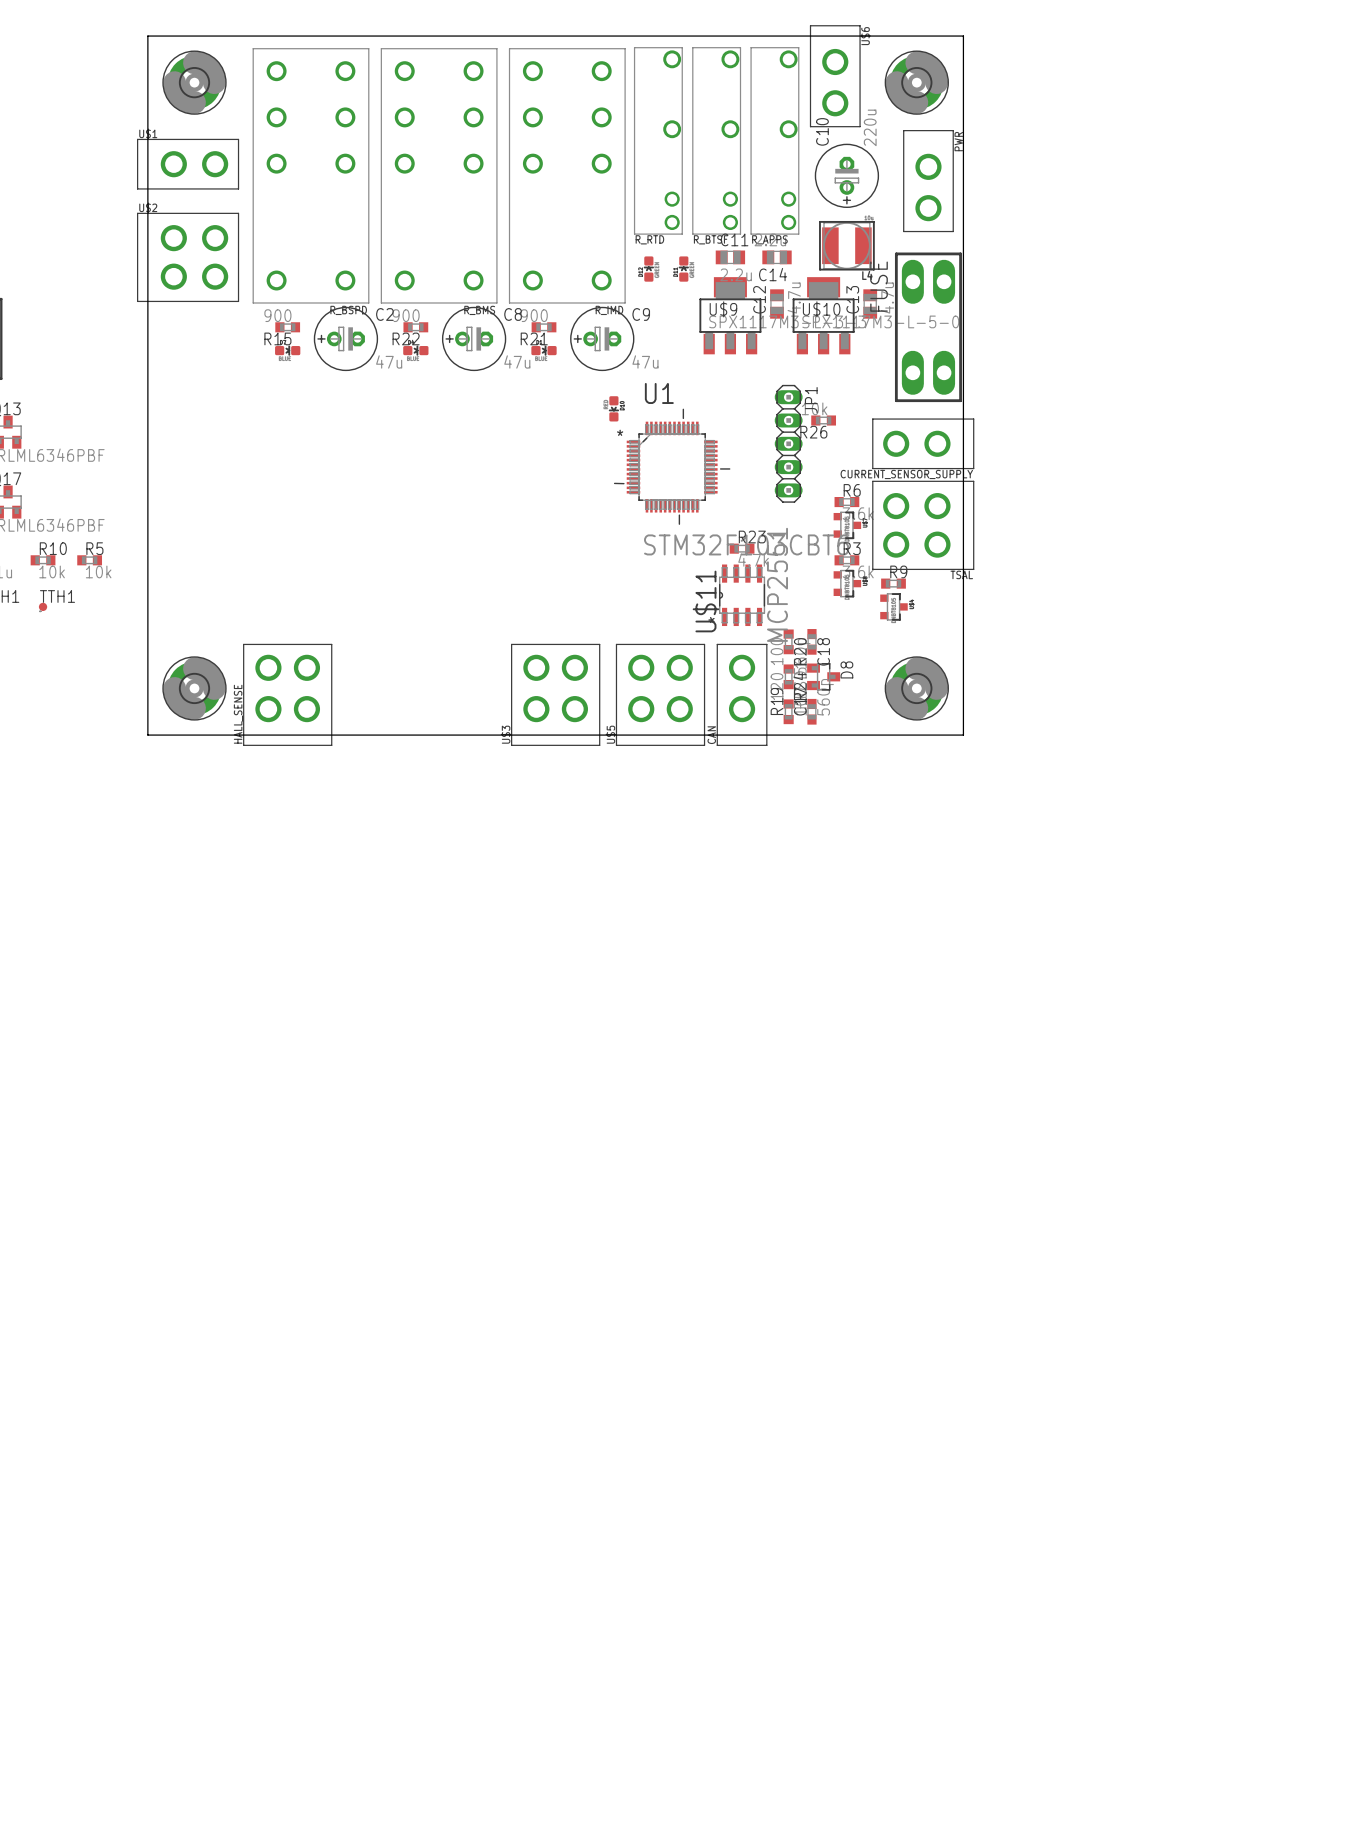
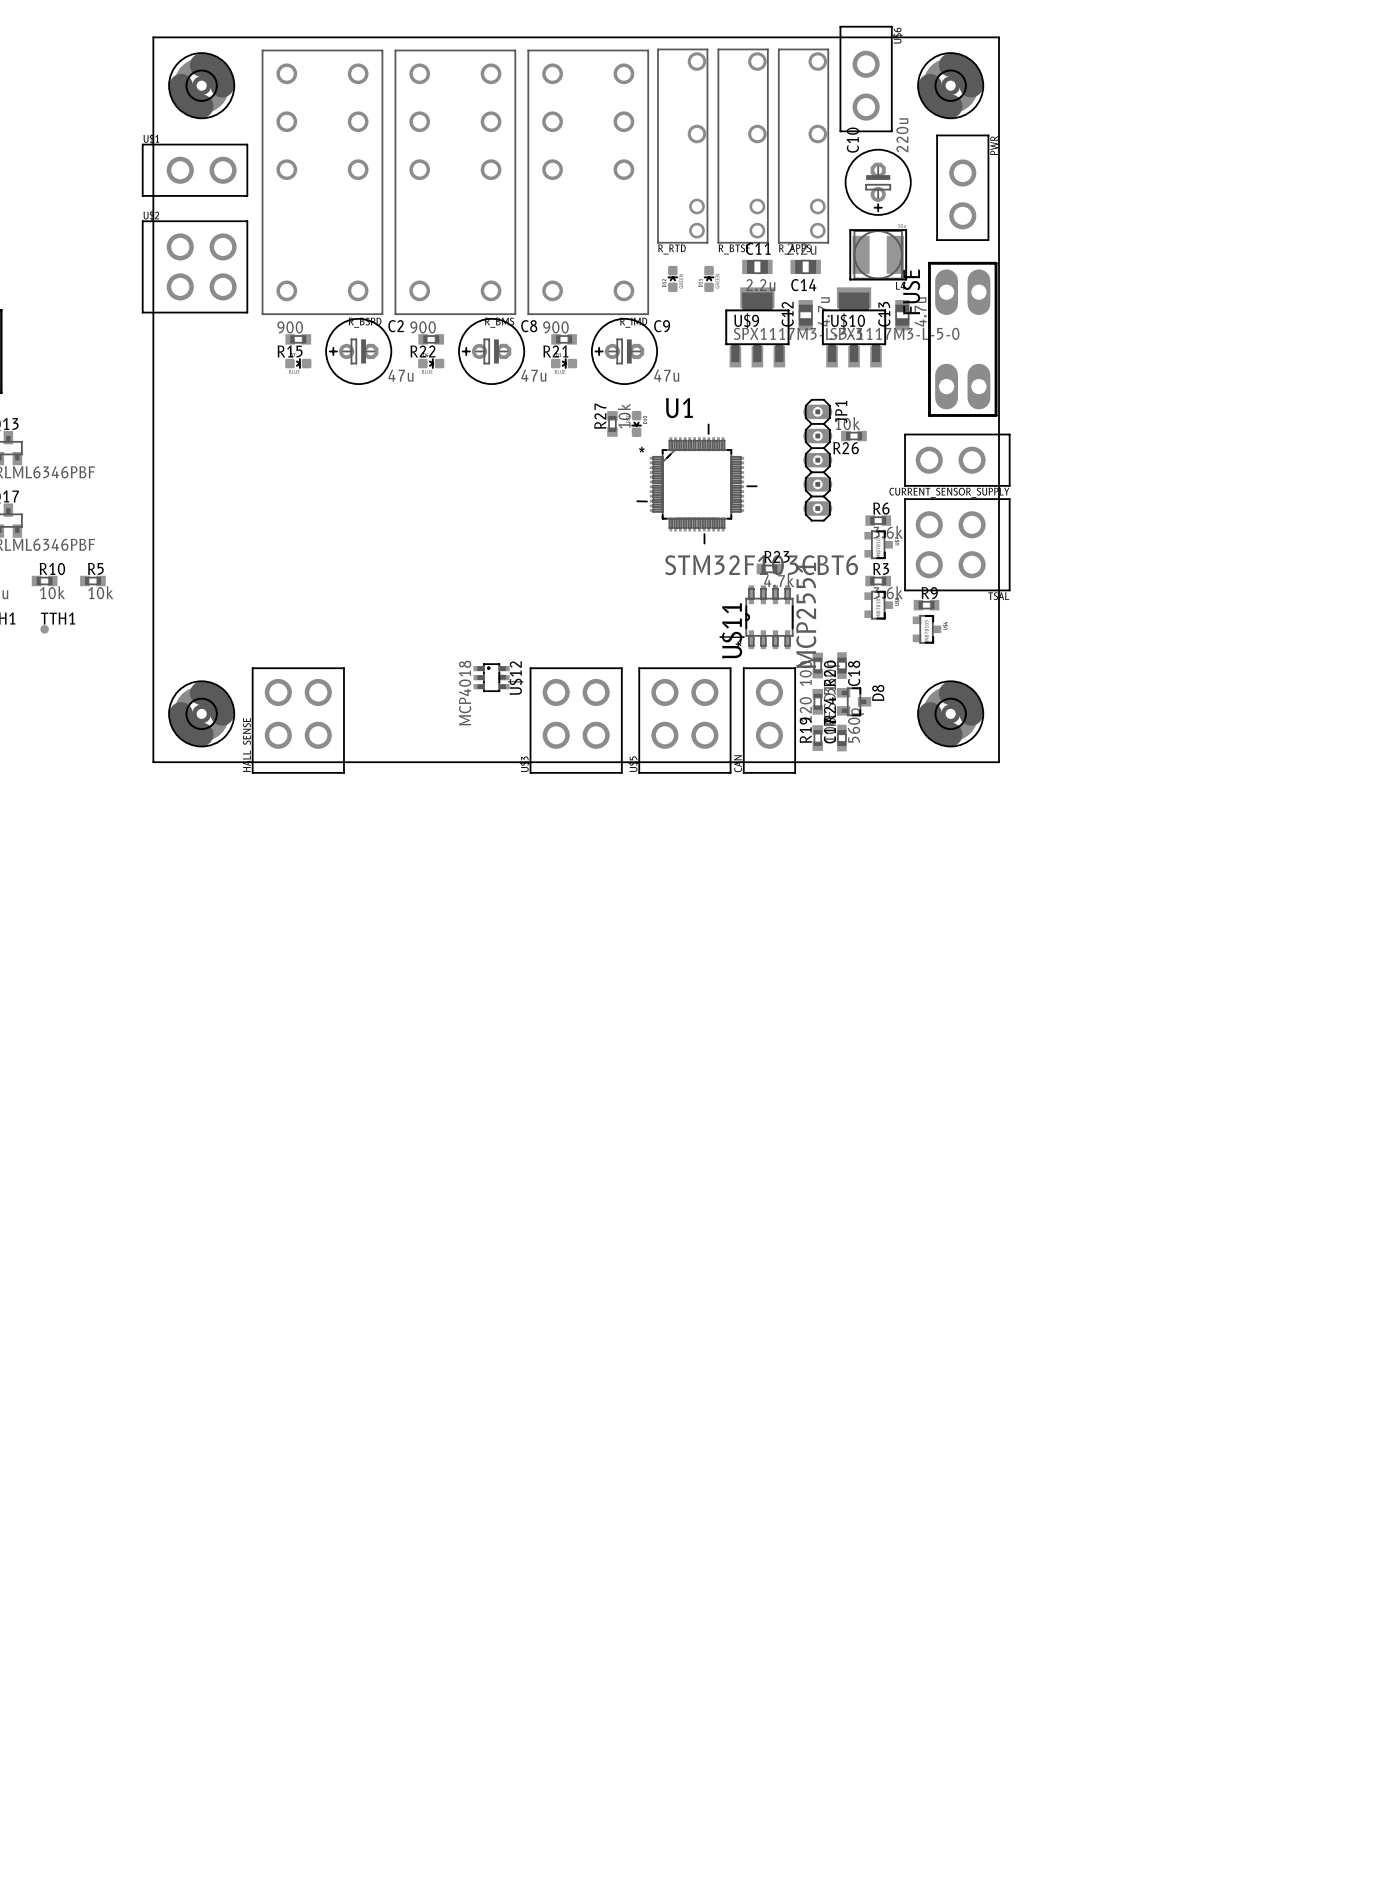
R27: none -> 10k (612, 423)
U$12: none -> MCP4018 (491, 677)

